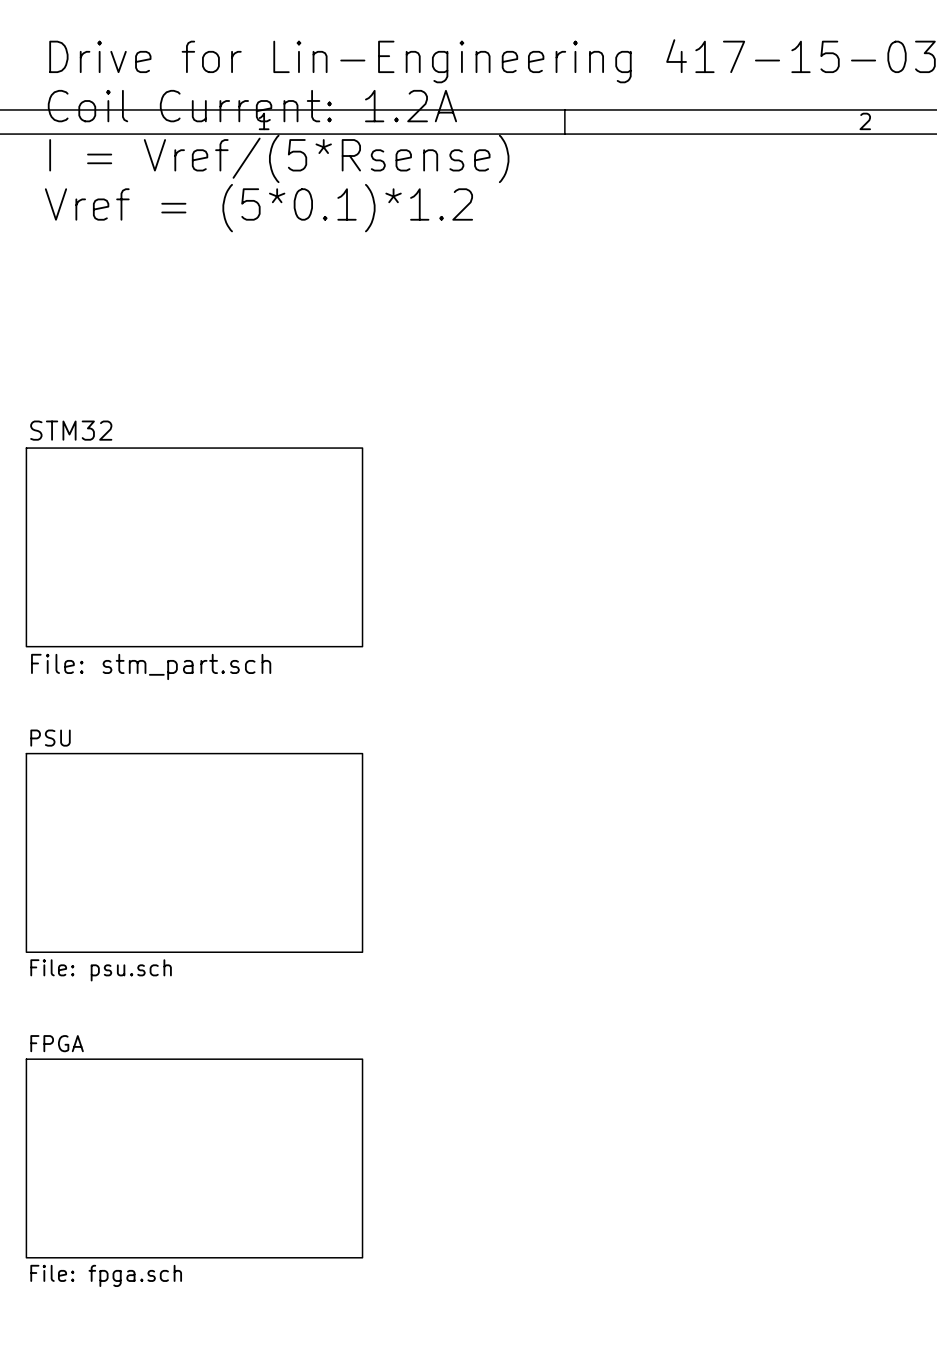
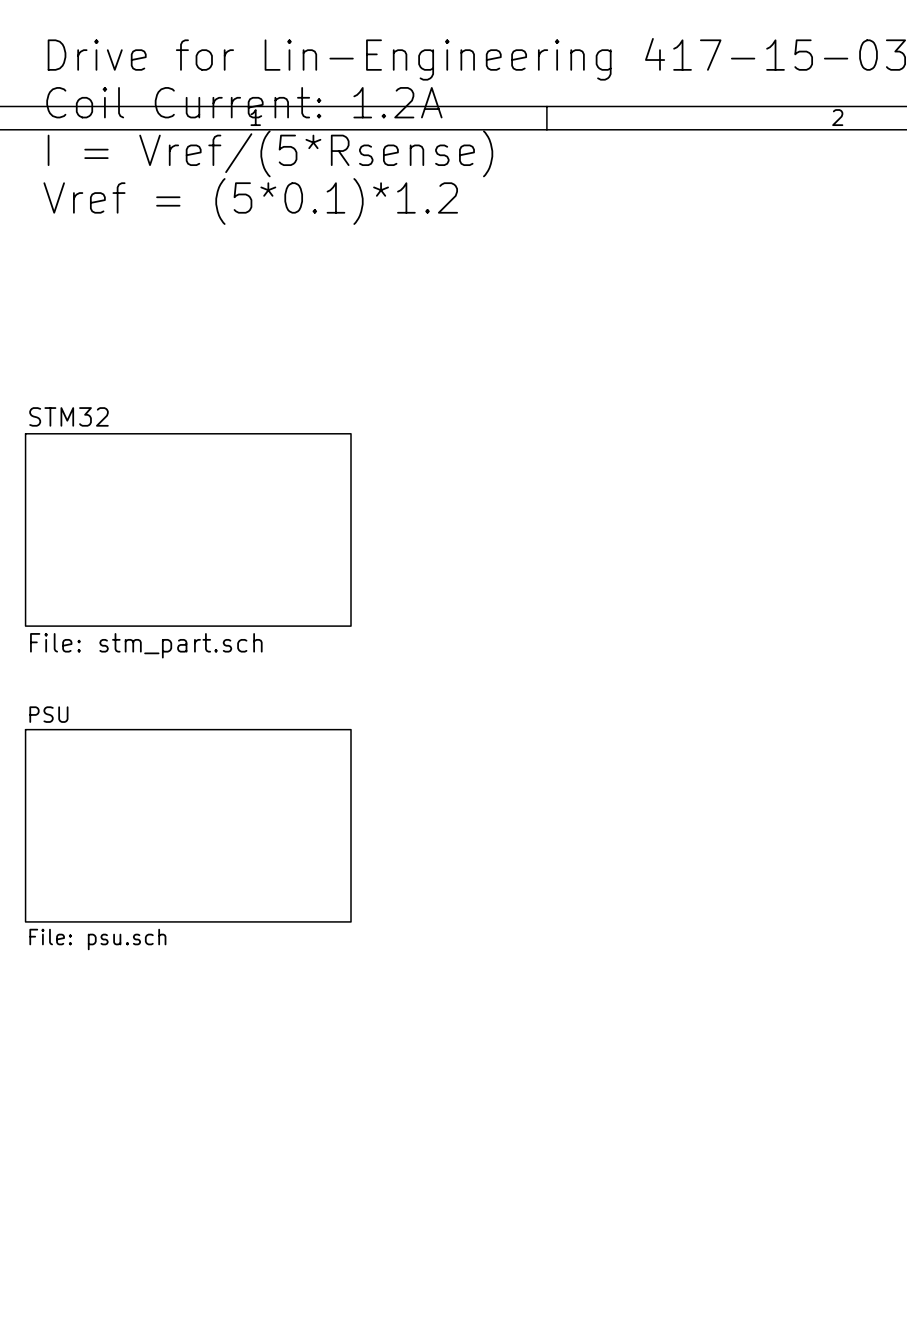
sheet FPGA: File: fpga.sch (194, 1158) -> none

